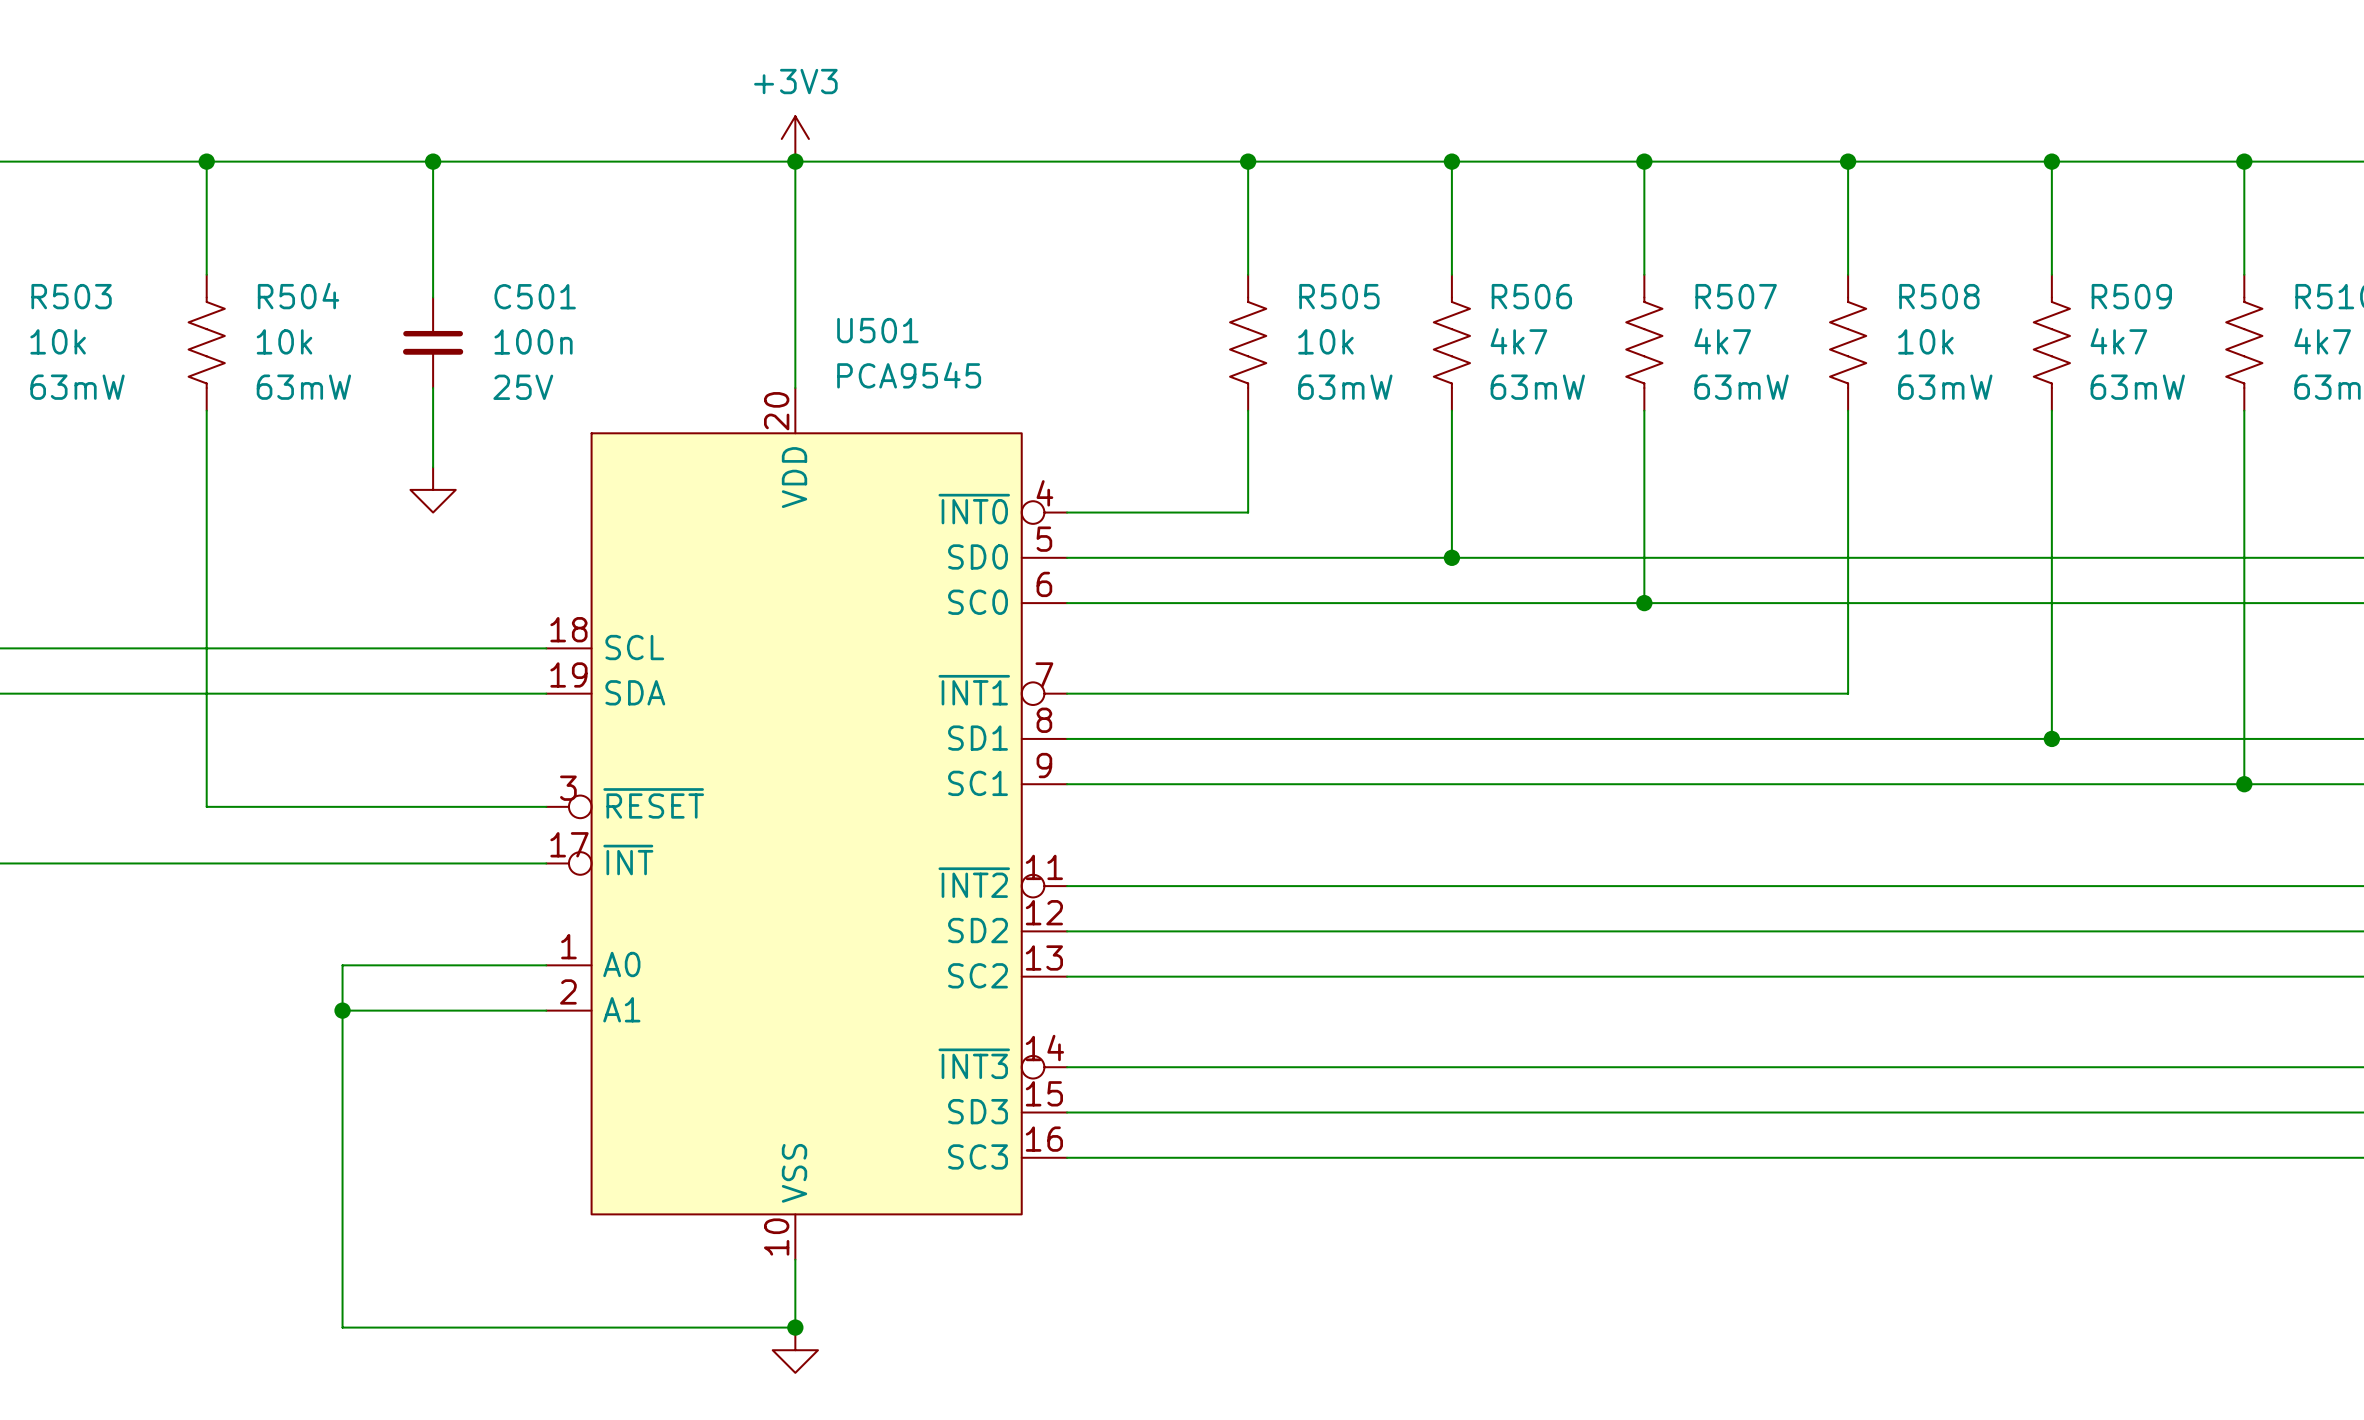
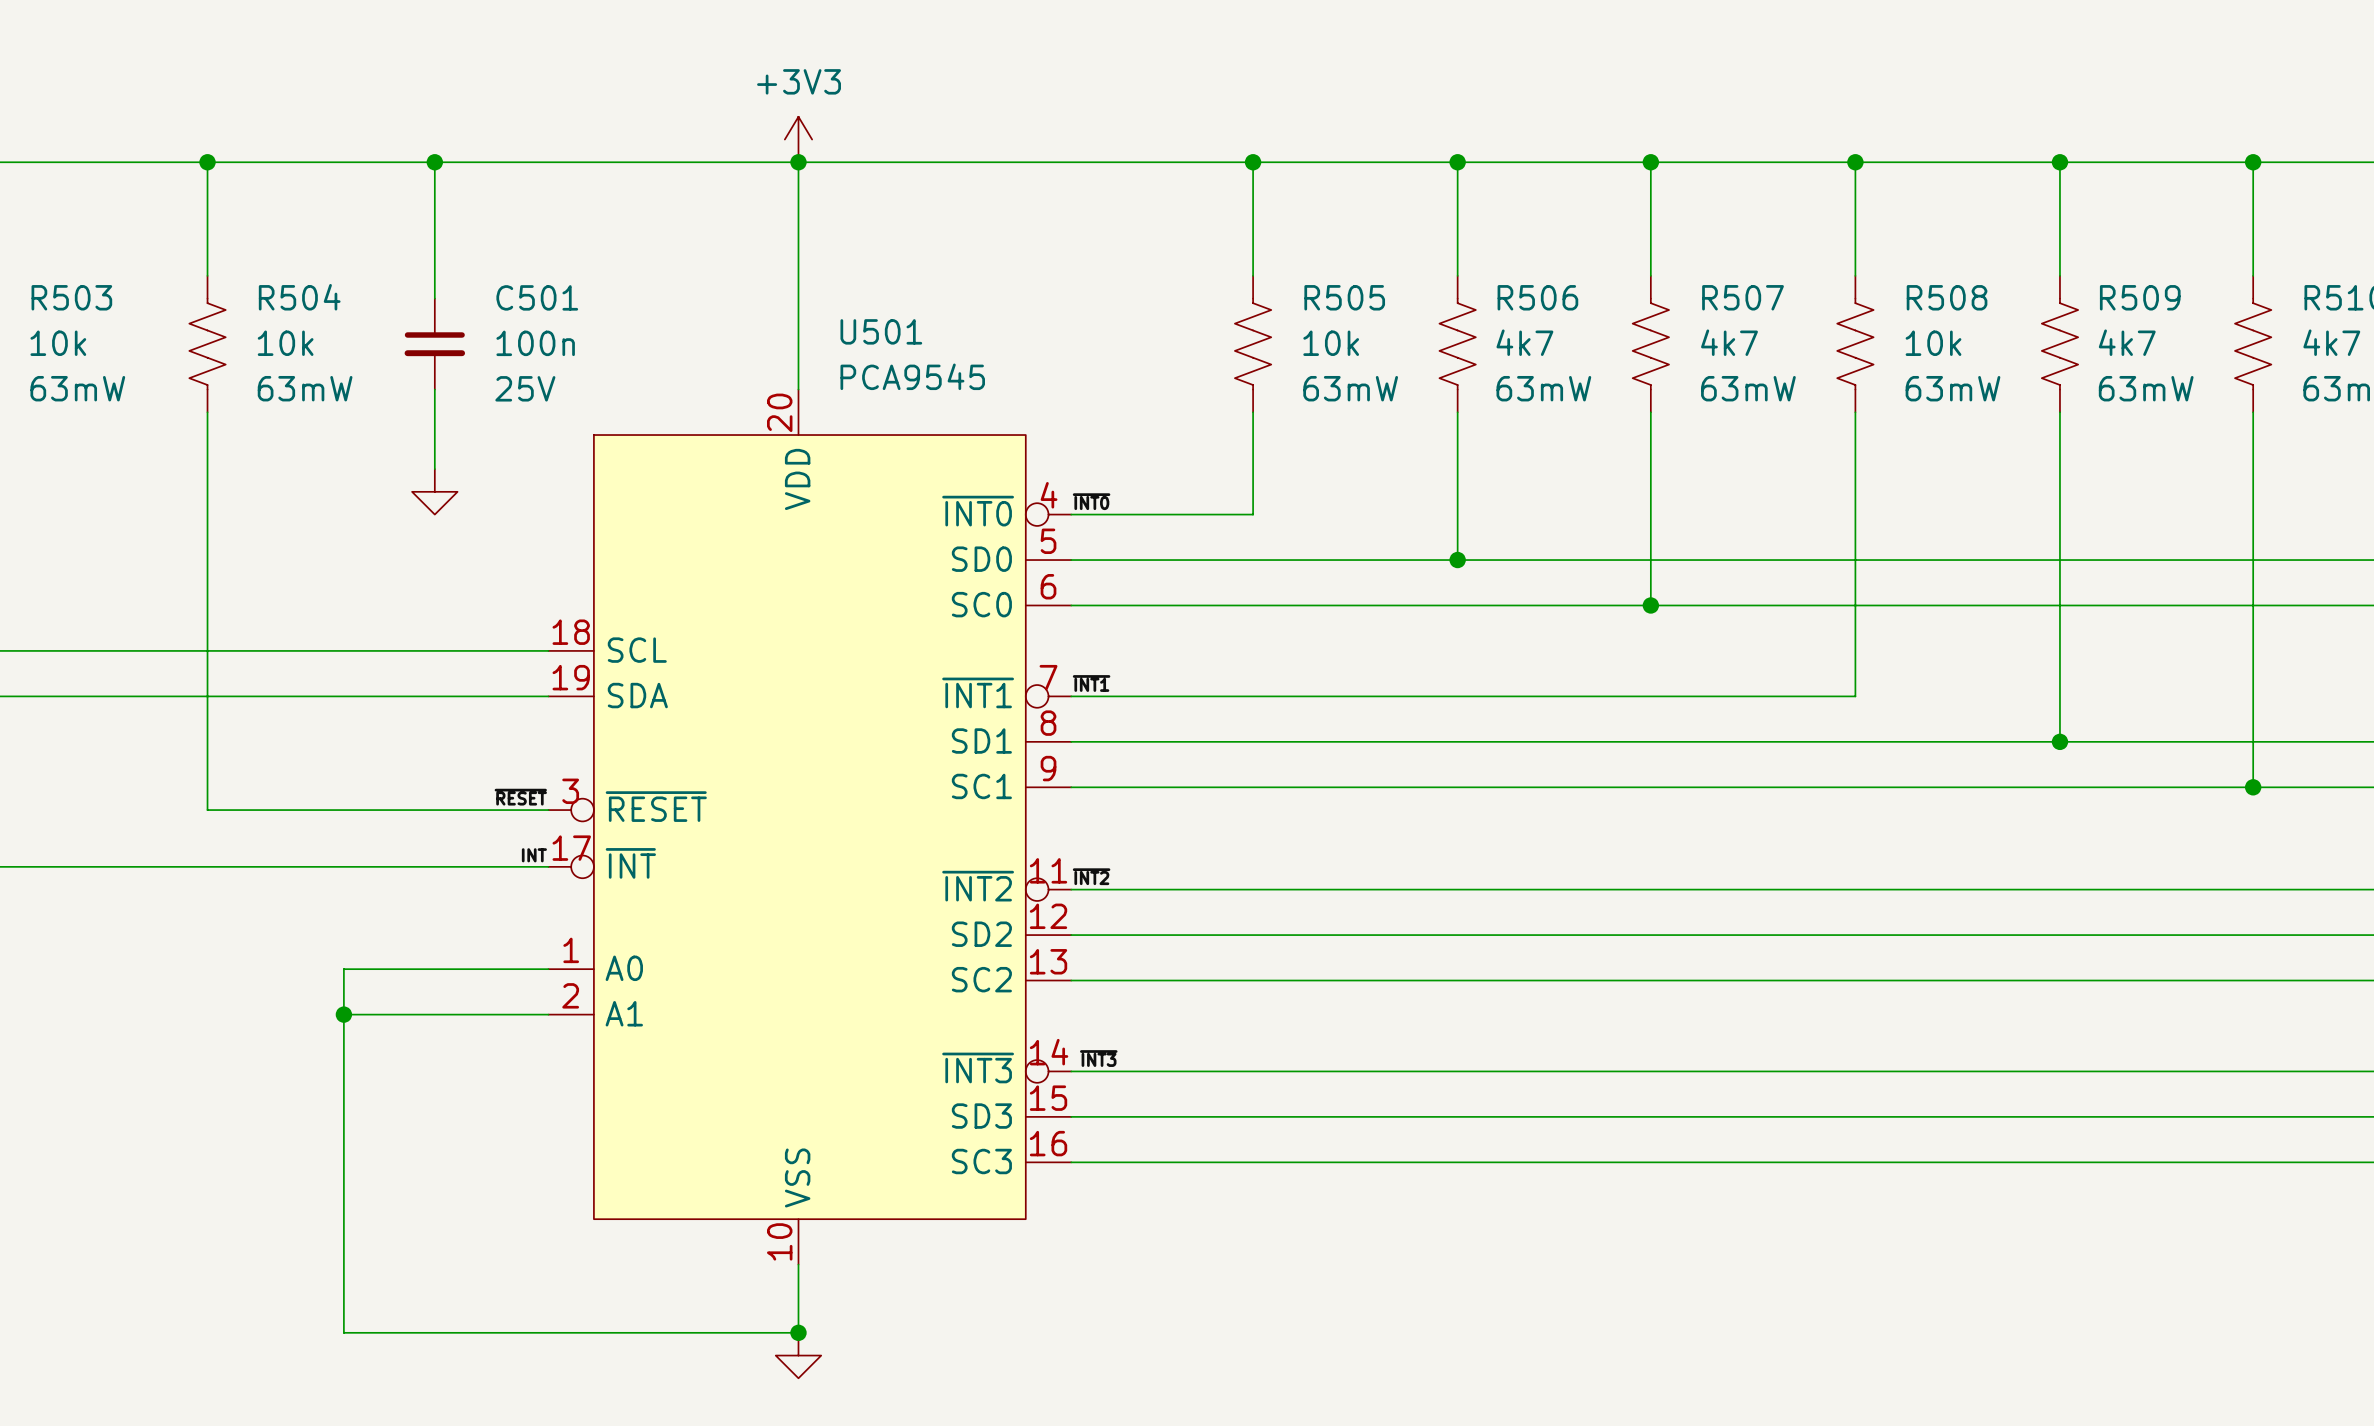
label: none -> ~{INT0} (1091, 501)
label: none -> ~{INT1} (1091, 683)
label: none -> ~{RESET} (520, 797)
label: none -> INT (534, 855)
label: none -> ~{INT2} (1091, 876)
label: none -> ~{INT3} (1098, 1058)

